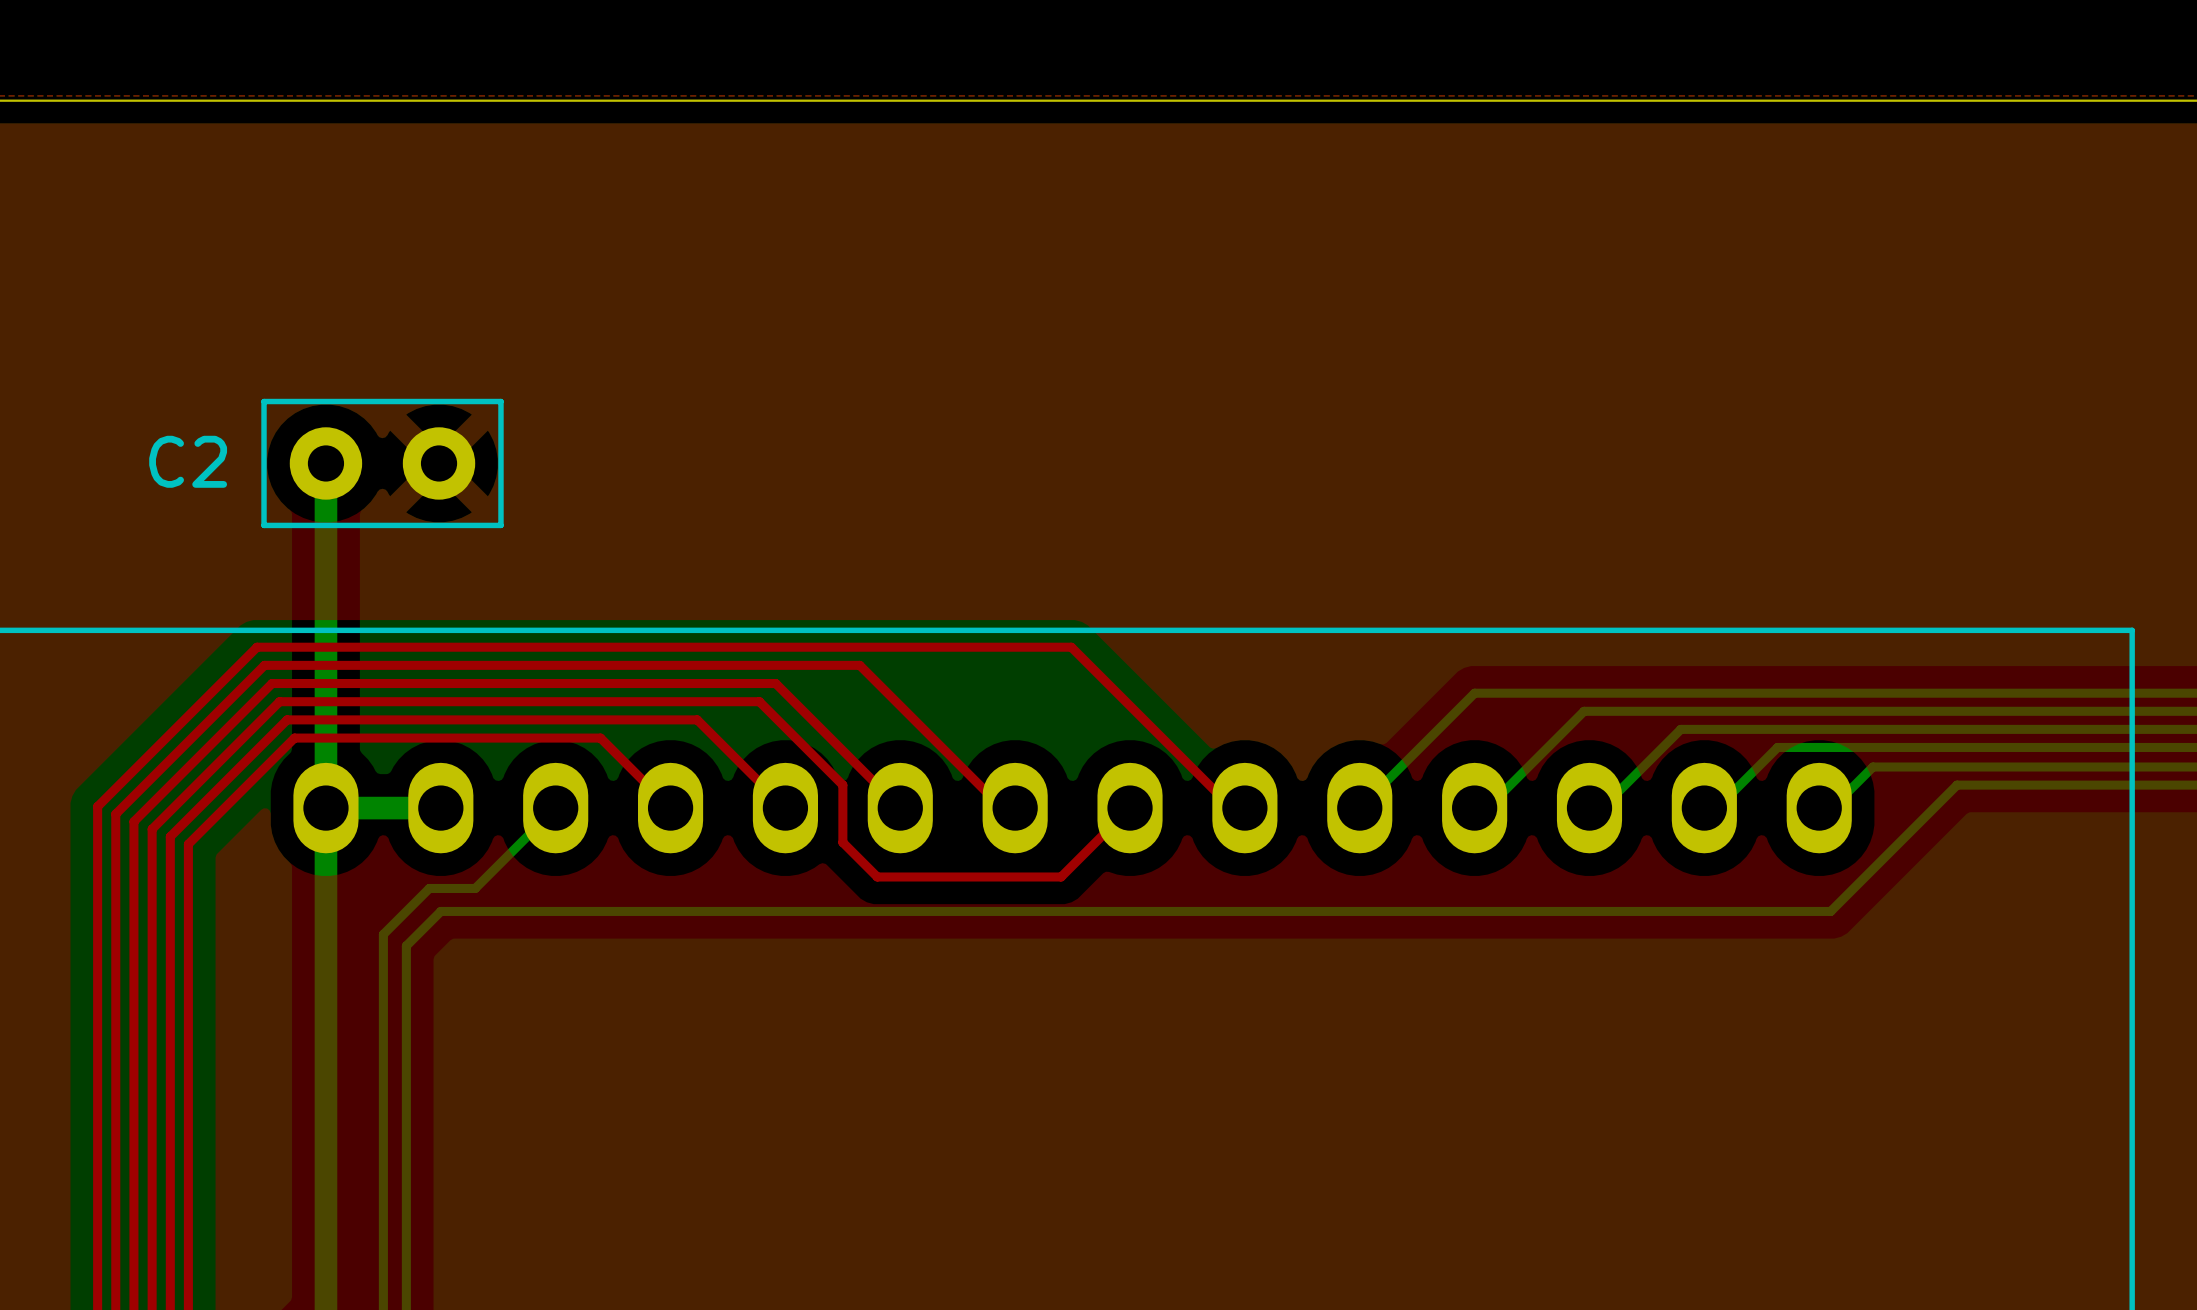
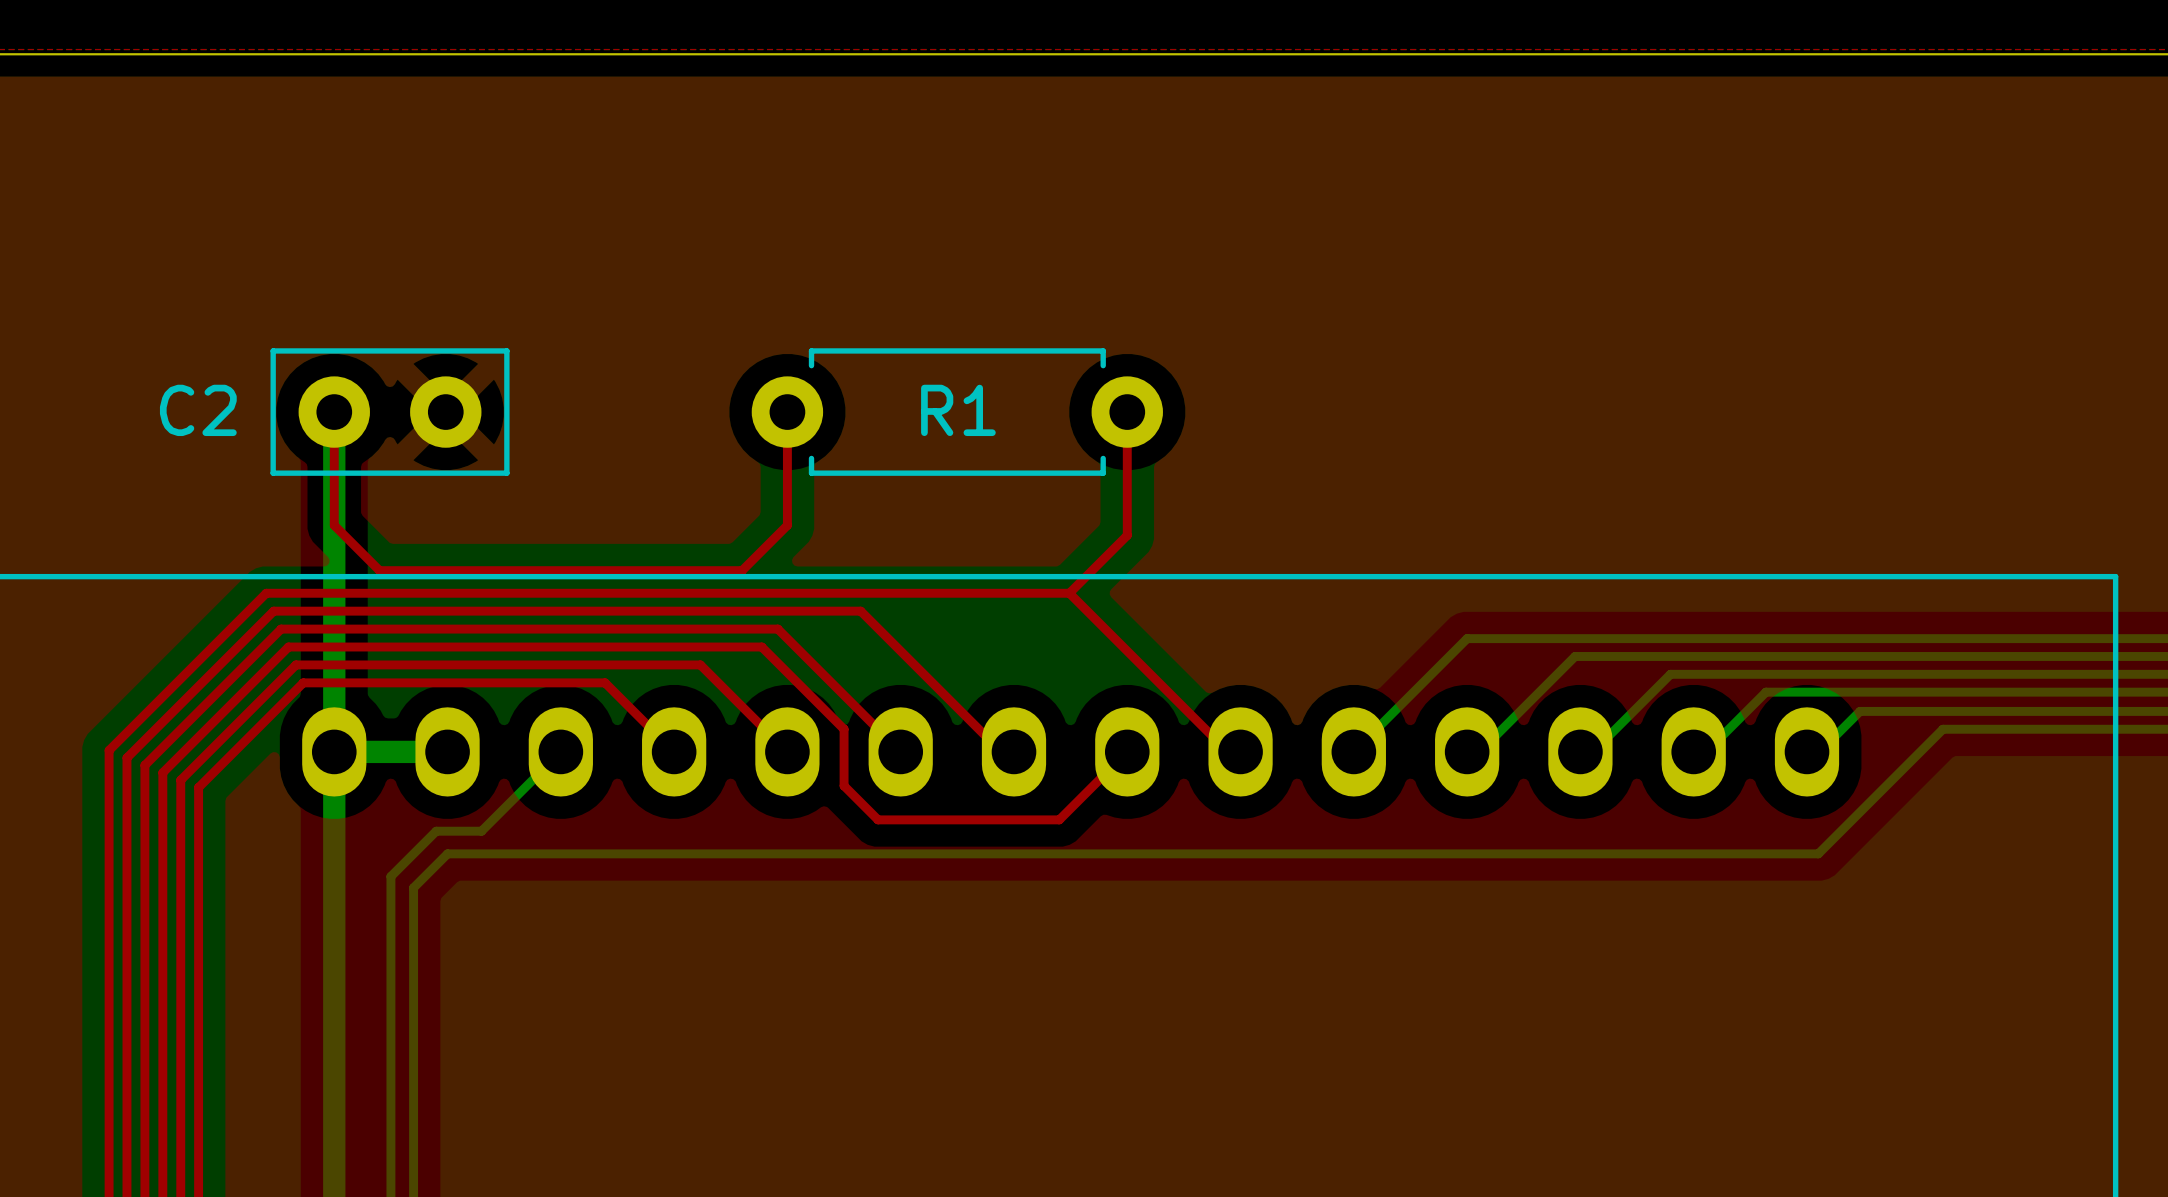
top track: none -> (334, 412) (334, 525) (379, 570) (742, 570) (787, 525) (787, 412)
R1: none -> (957, 412)
top track: none -> (1127, 412) (1127, 535) (1069, 593)

